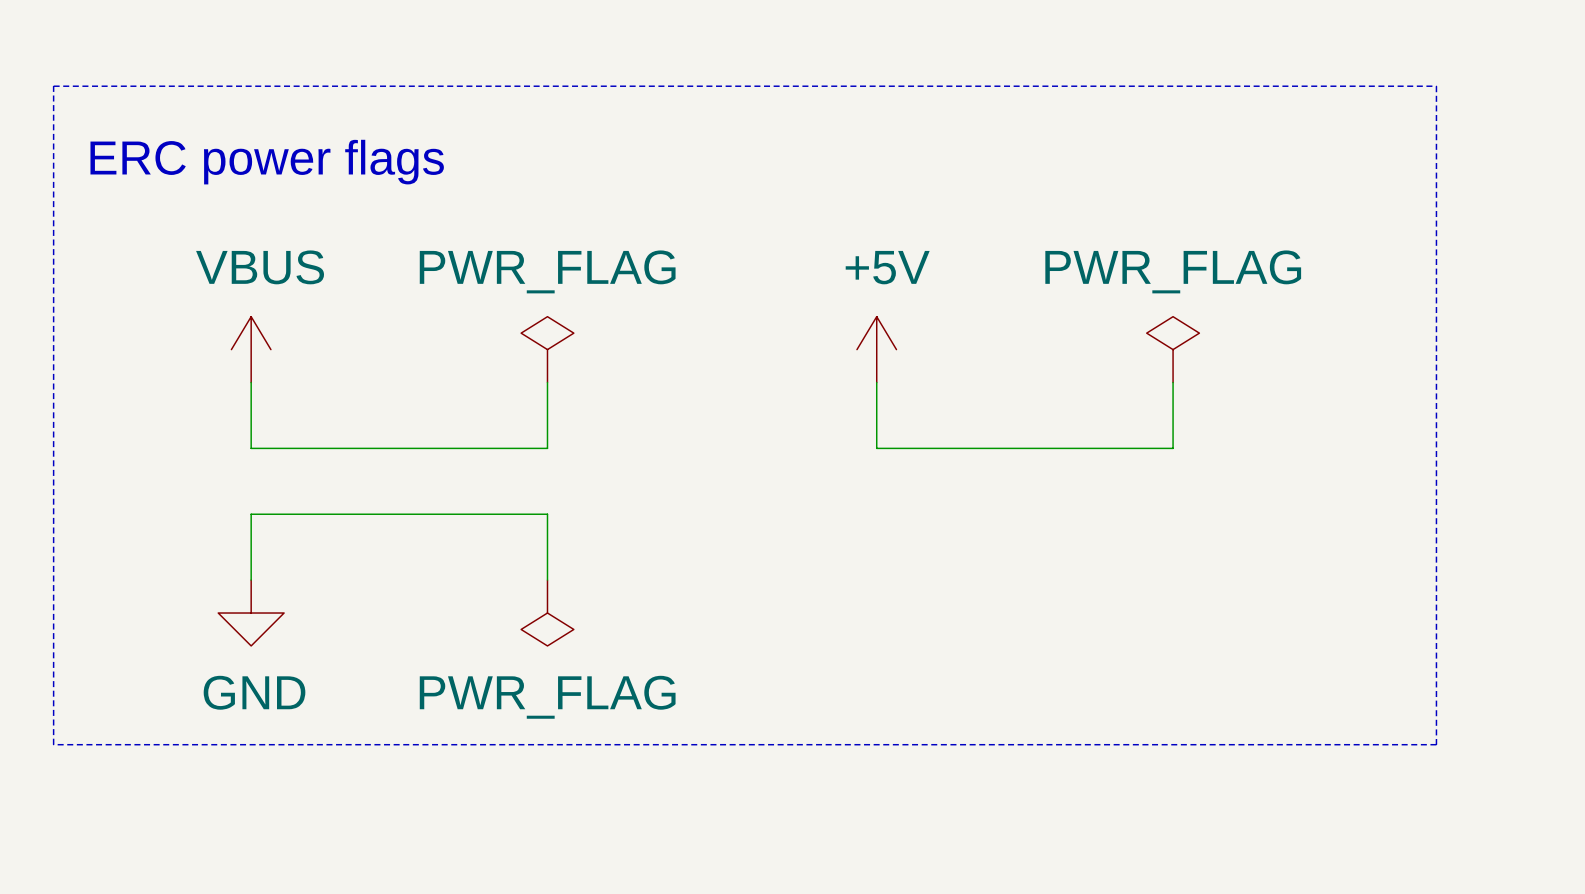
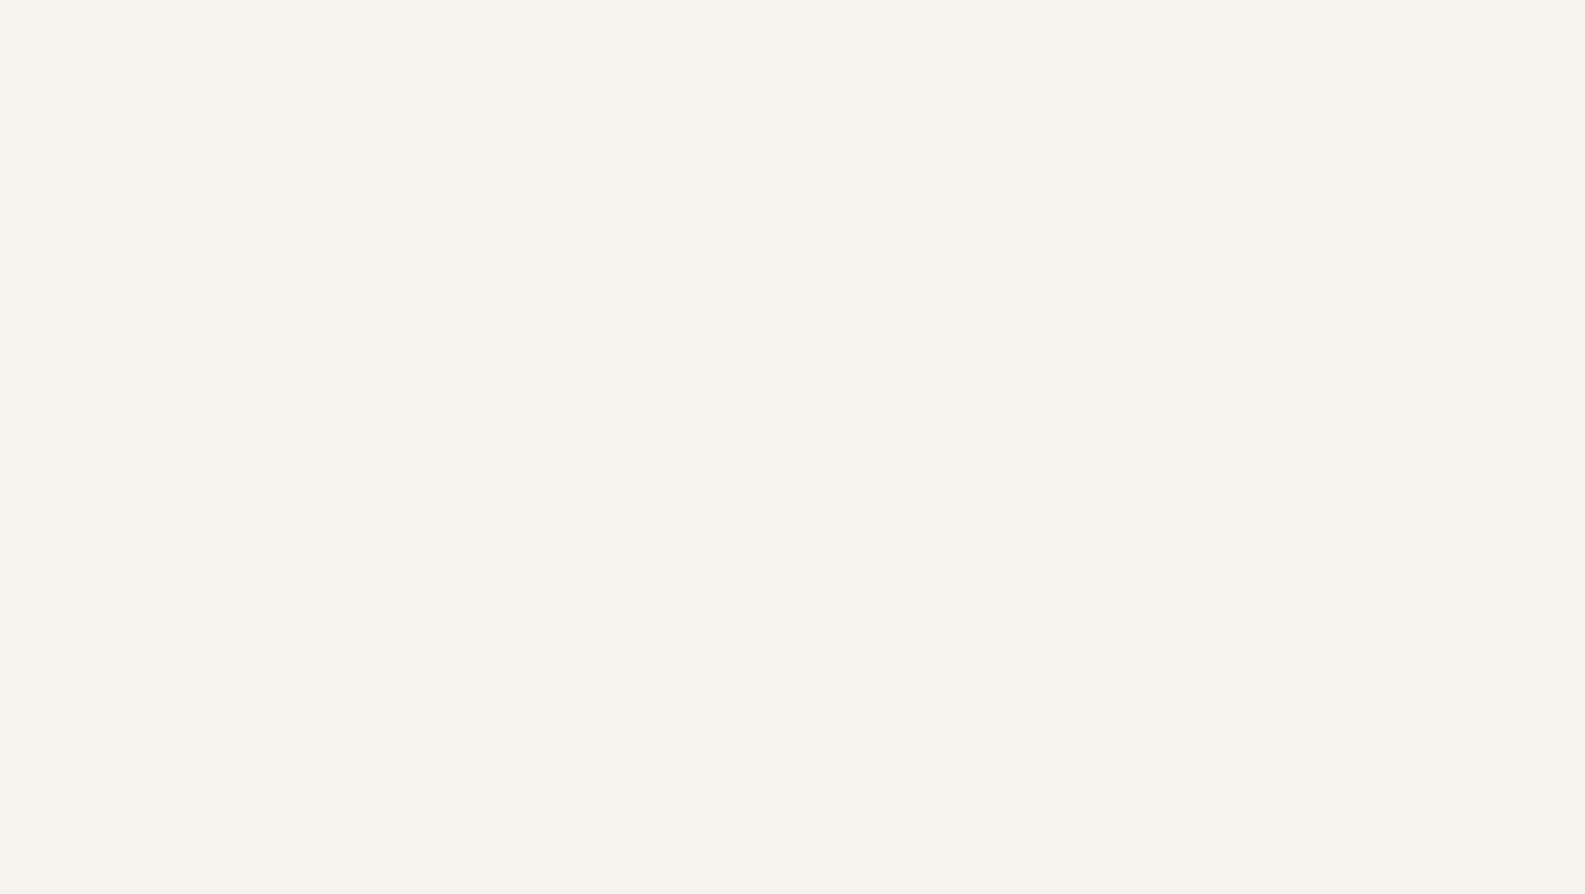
line: (53, 86) (1436, 86) (1436, 744) (53, 744) (53, 86) -> none
text: ERC power flags (267, 162) -> none
power symbol: VBUS (251, 349) -> none
power symbol: PWR_FLAG (547, 349) -> none
power symbol: +5V (876, 349) -> none
power symbol: PWR_FLAG (1173, 349) -> none
wire: (251, 382) (251, 448) (547, 448) (547, 382) -> none
wire: (876, 382) (876, 448) (1173, 448) (1173, 382) -> none
wire: (251, 580) (251, 514) (547, 514) (547, 580) -> none
power symbol: GND (251, 613) -> none
power symbol: PWR_FLAG (547, 613) -> none

